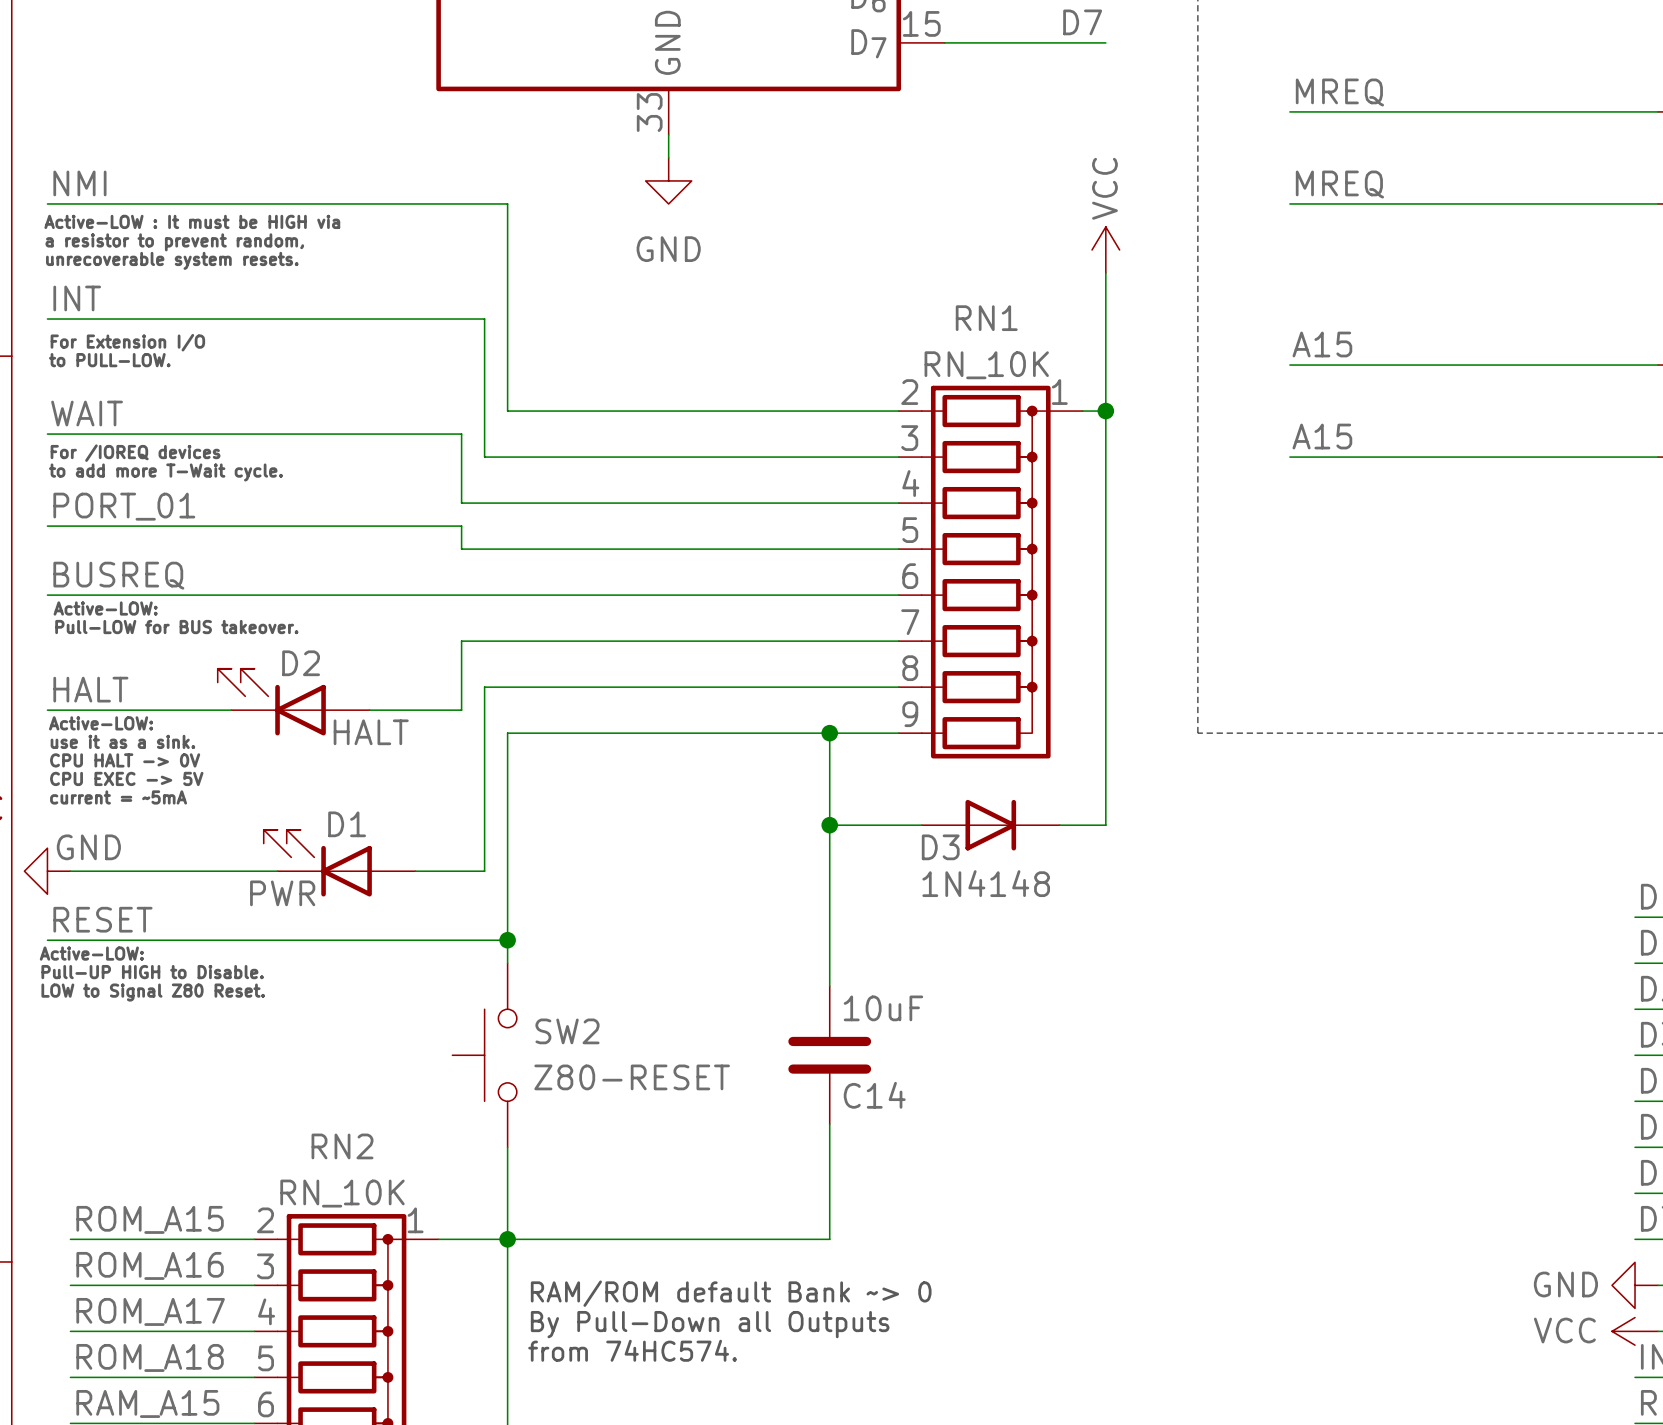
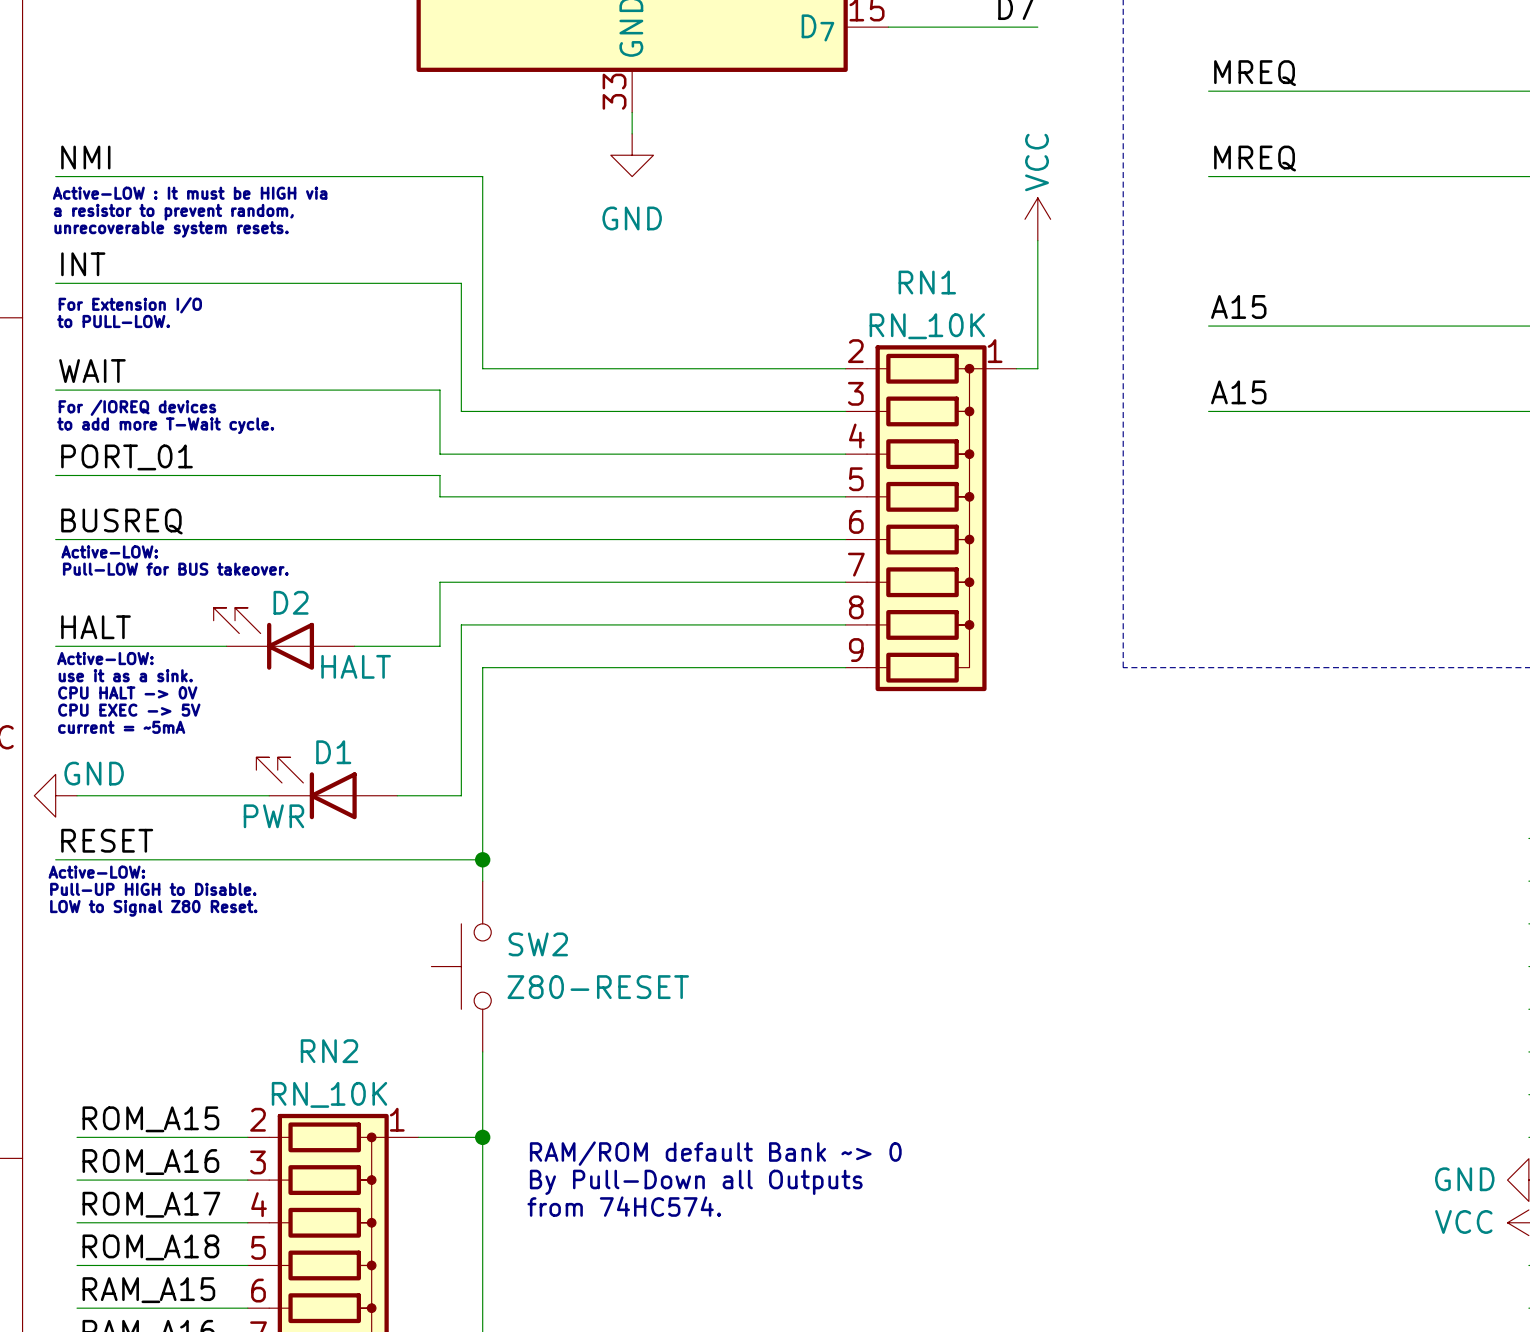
wire: (1105, 411) (1105, 825) (1059, 825) -> none
junction: (1105, 411) -> none
wire: (829, 733) (829, 986) -> none
junction: (829, 733) -> none
wire: (829, 825) (921, 825) -> none
junction: (829, 825) -> none
D3: 1N4148 (990, 825) -> none
C14: 10uF (829, 1055) -> none
wire: (829, 1124) (829, 1239) (507, 1239) -> none
text position: RAM/ROM default Bank ~> 0 (731, 1293) -> RAM/ROM default Bank ~> 0 (715, 1153)
text position: By Pull-Down all Outputs (710, 1324) -> By Pull-Down all Outputs (696, 1182)
text position: from 74HC574. (632, 1350) -> from 74HC574. (624, 1206)

